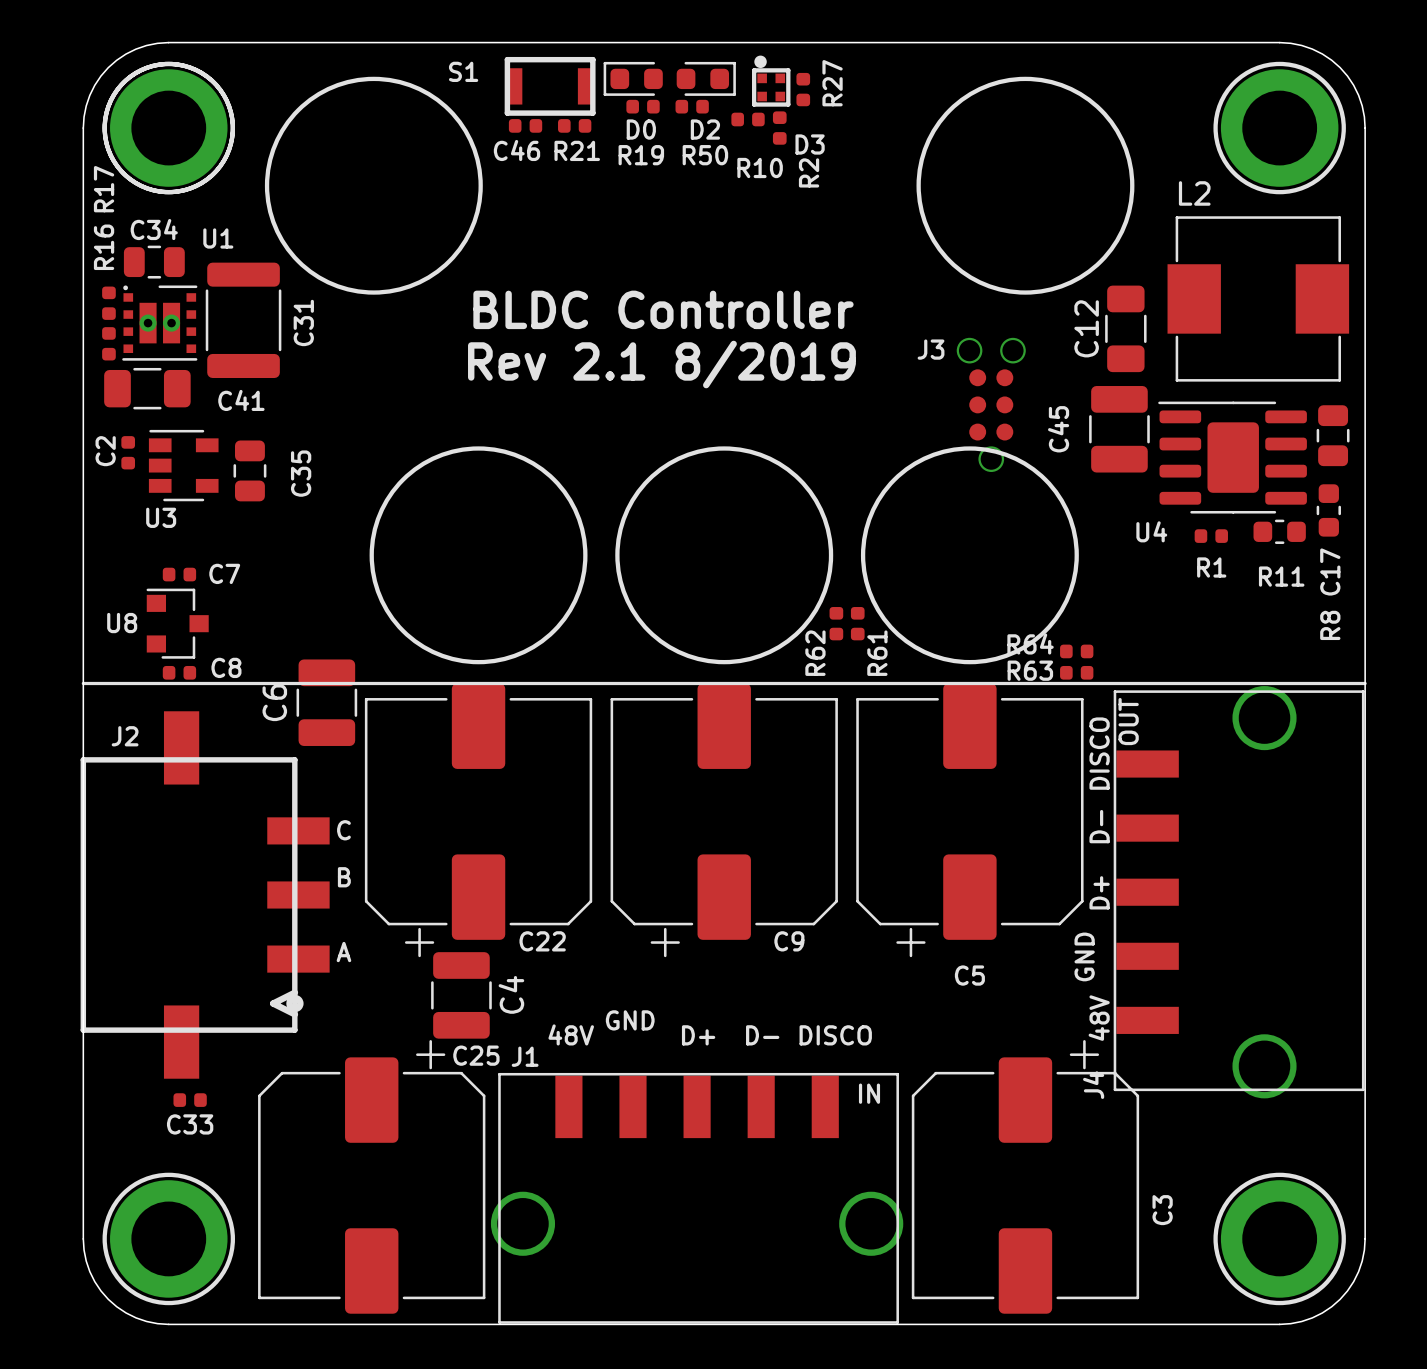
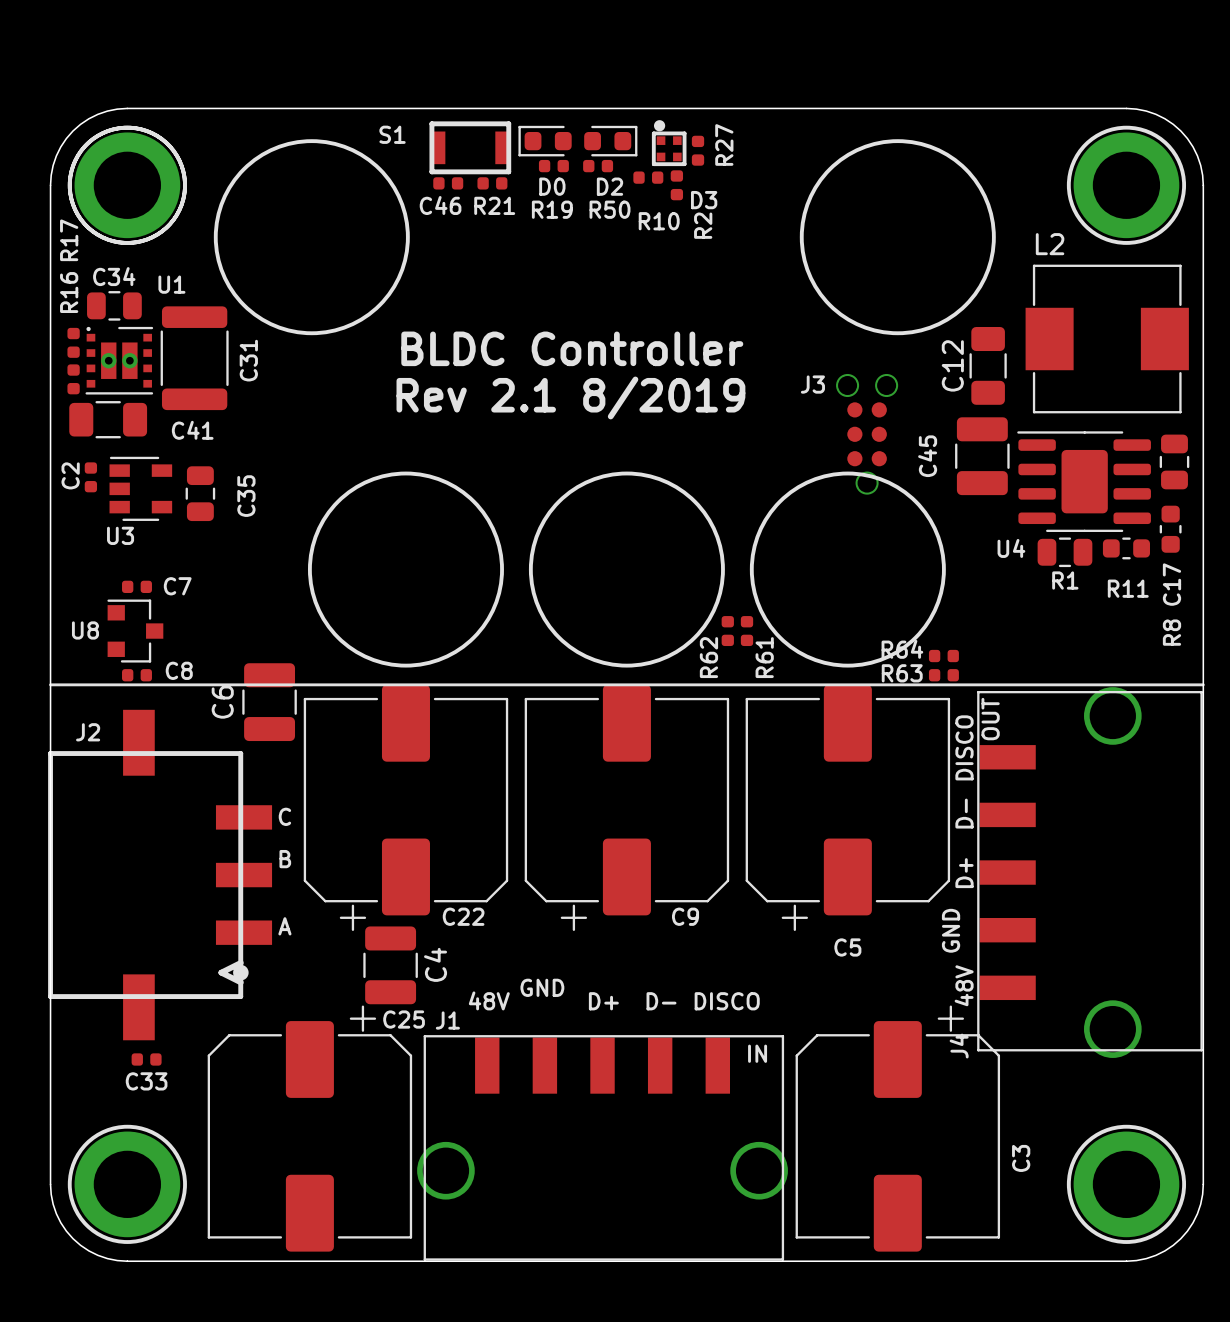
R1 footprint: [1194, 529, 1228, 543] -> [1037, 537, 1093, 568]

